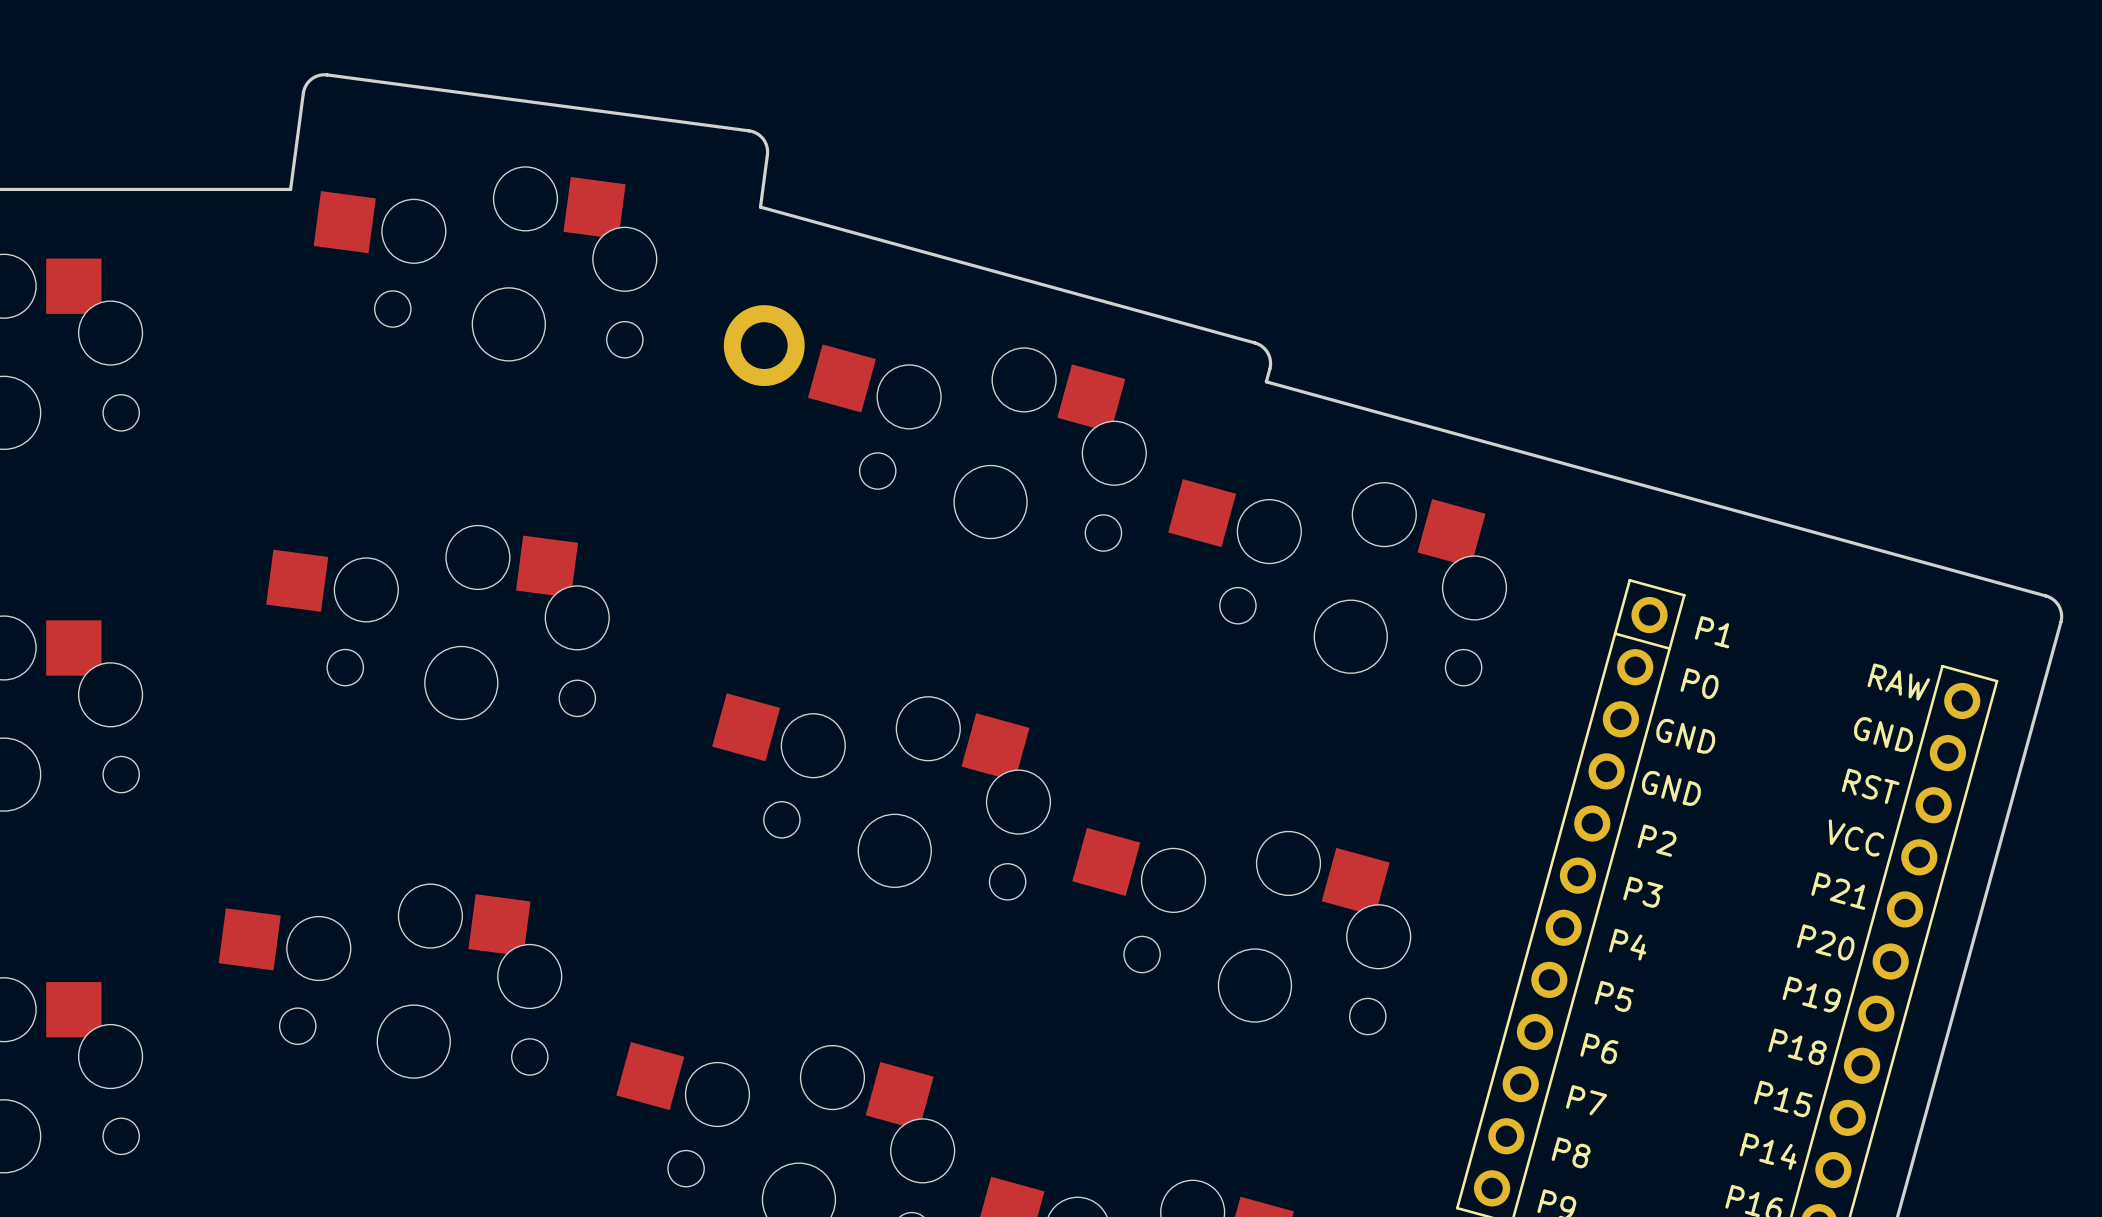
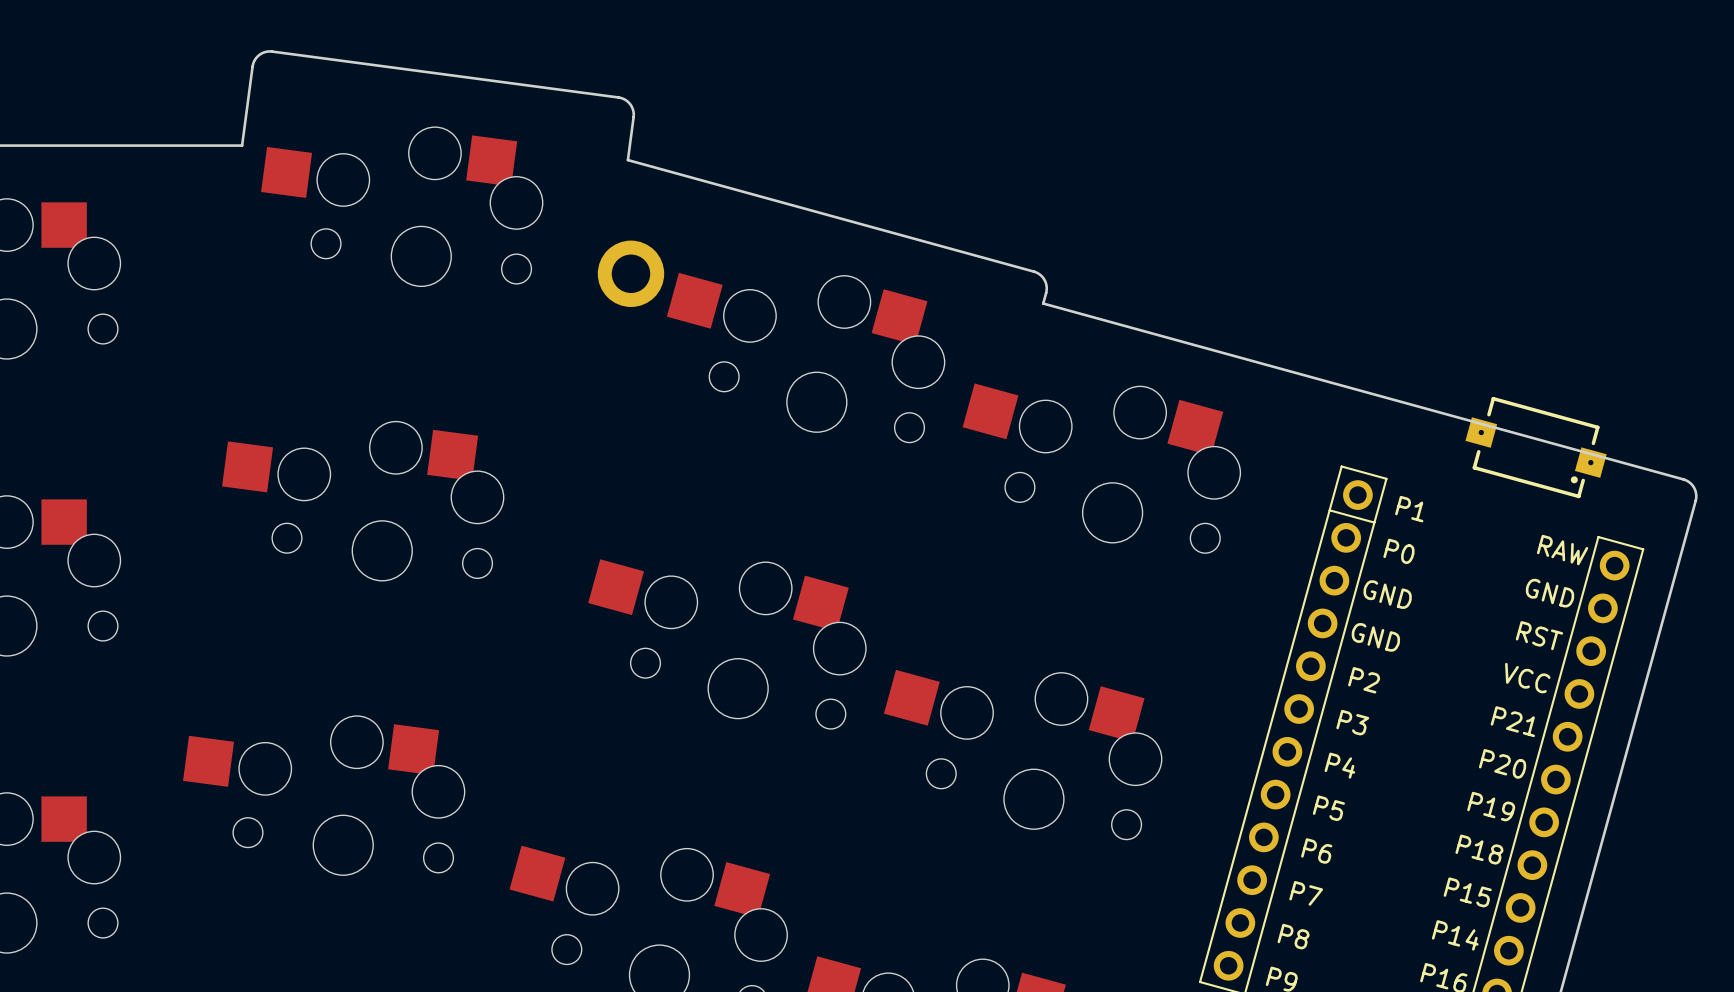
part: none -> (1536, 447)

